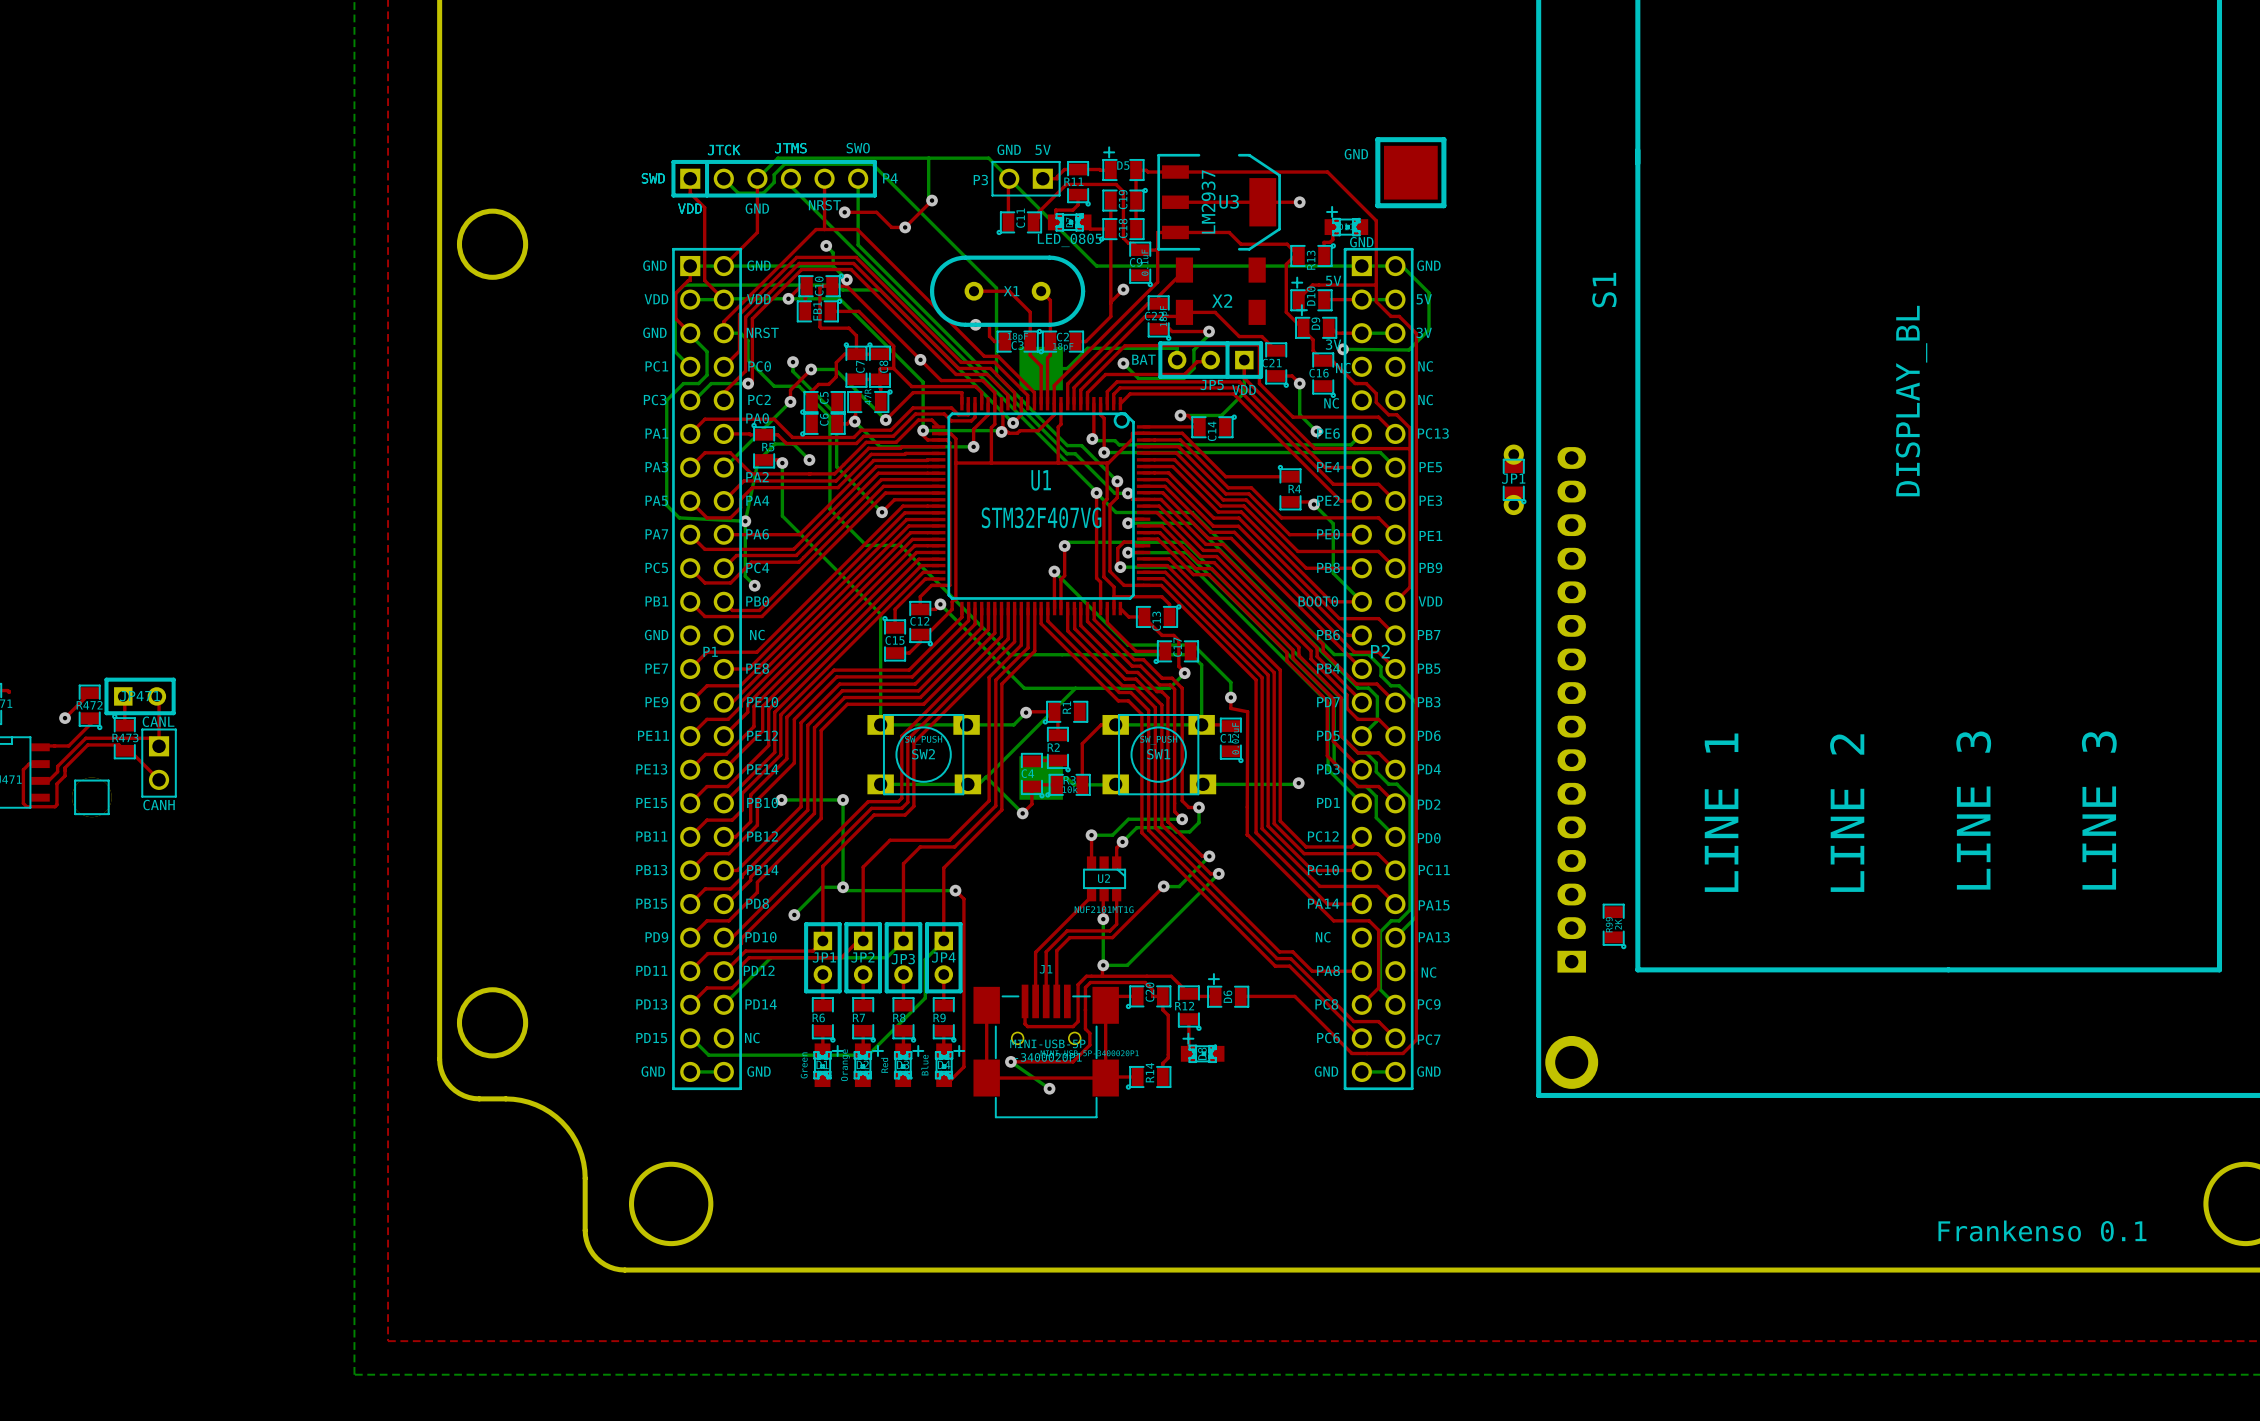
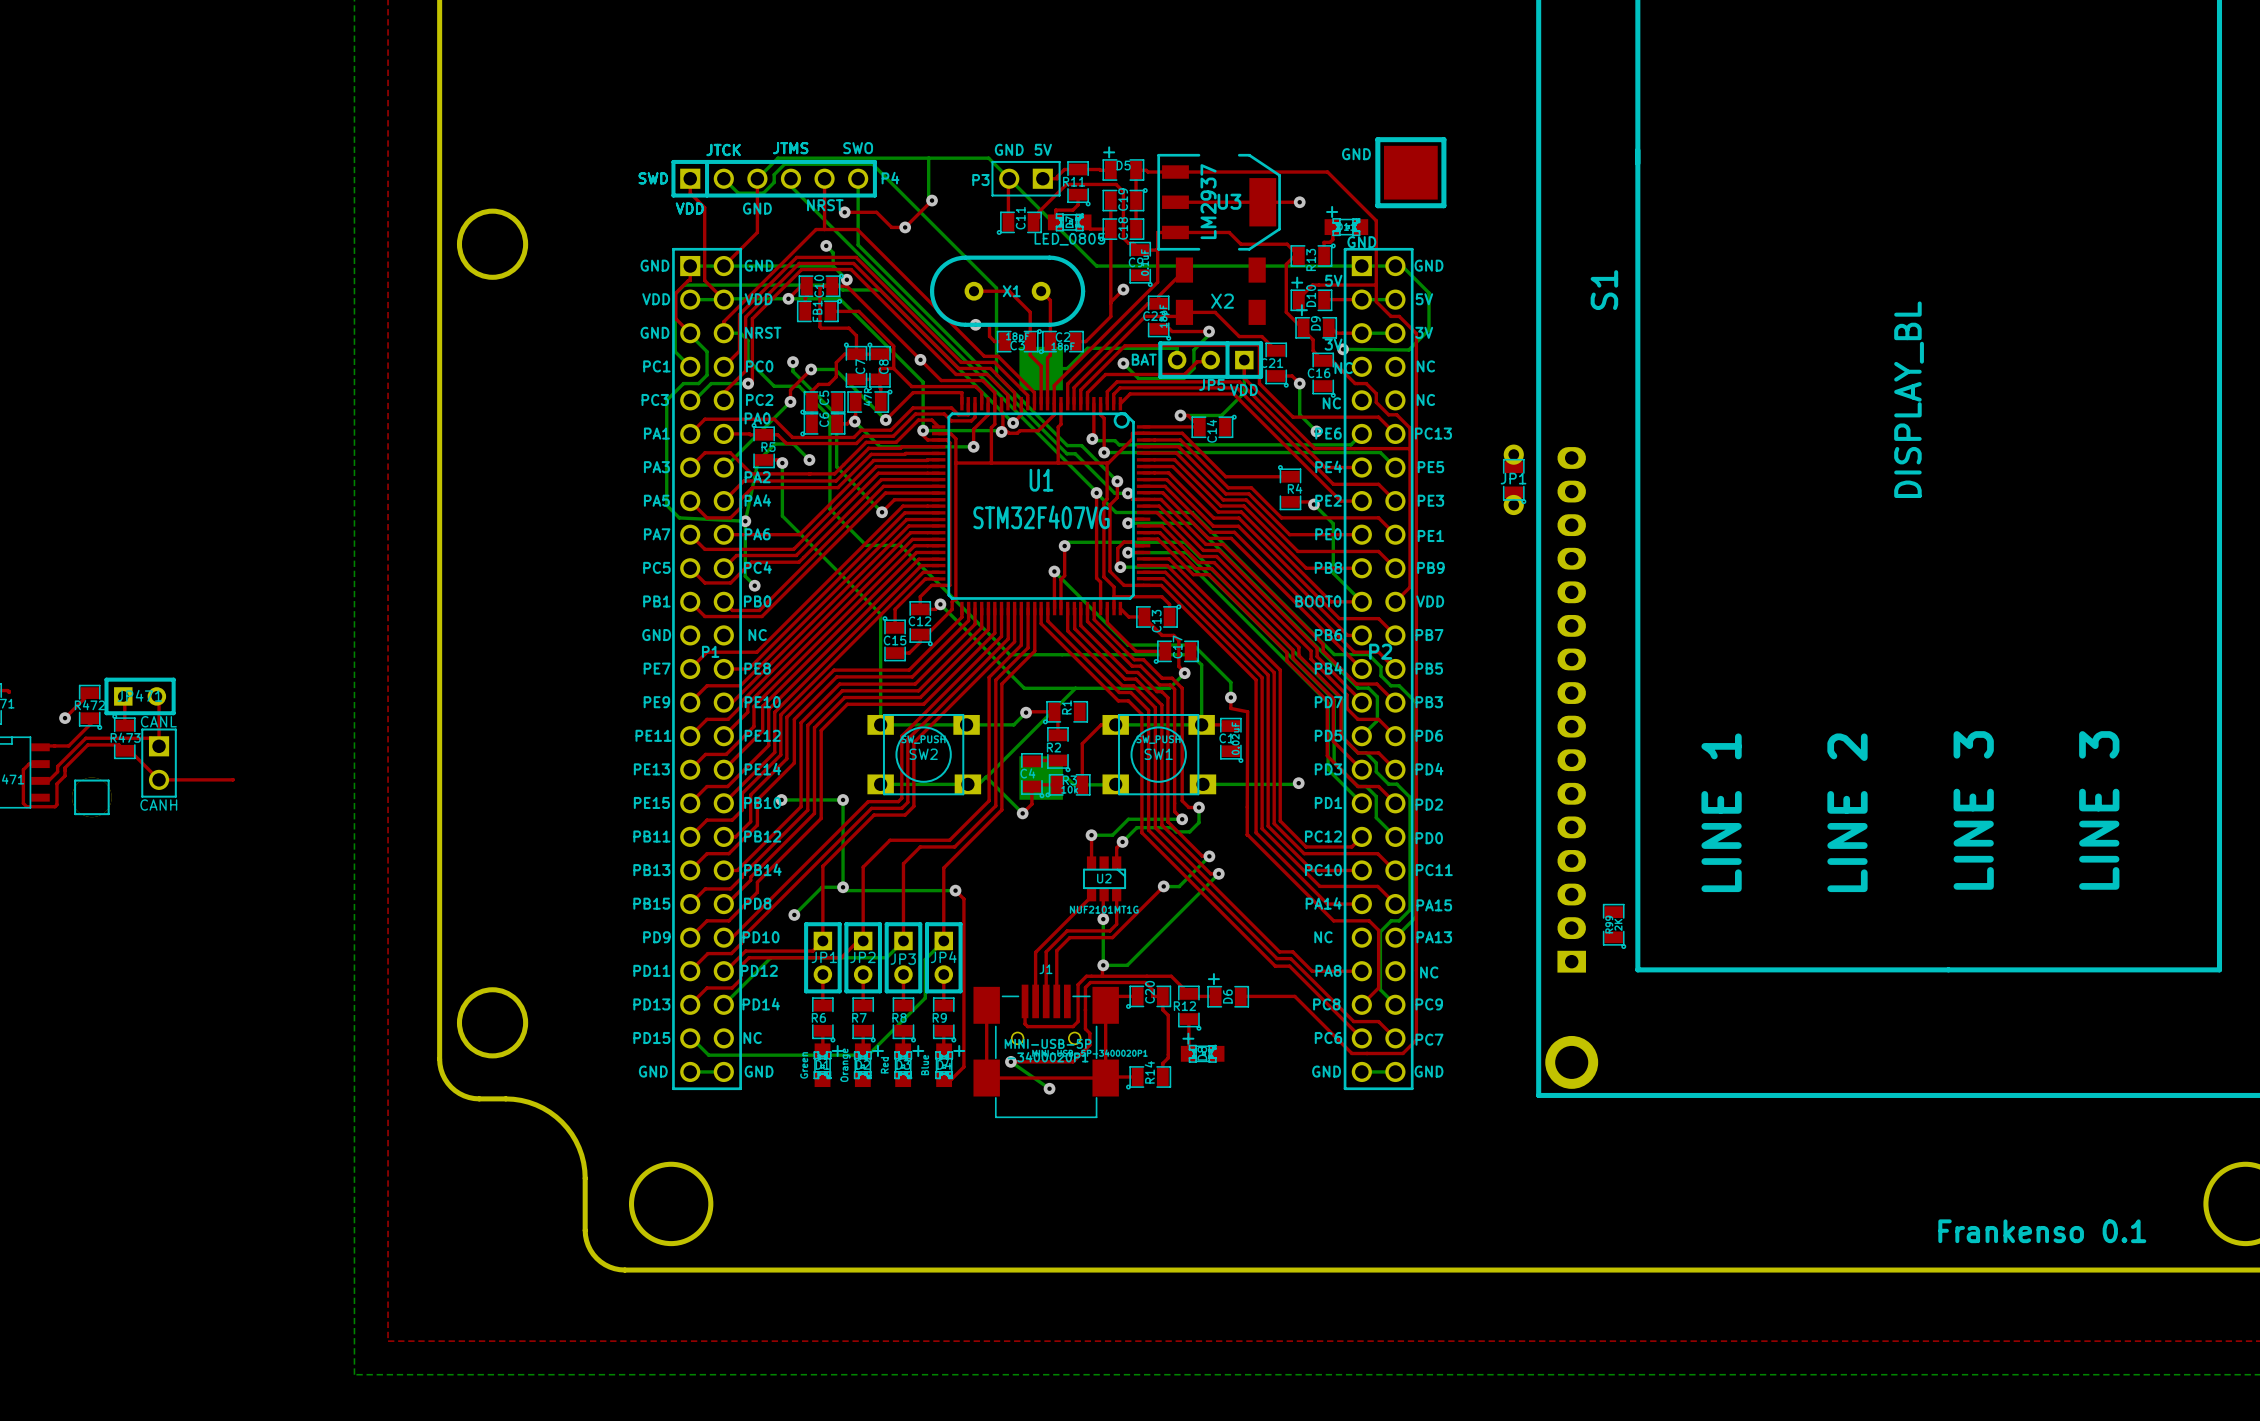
top track: none -> (233, 779) (159, 779)

